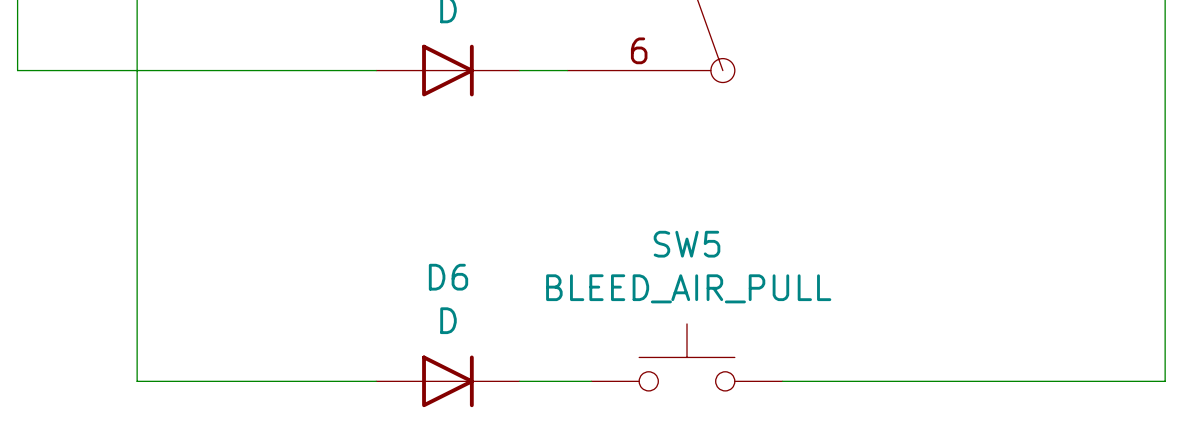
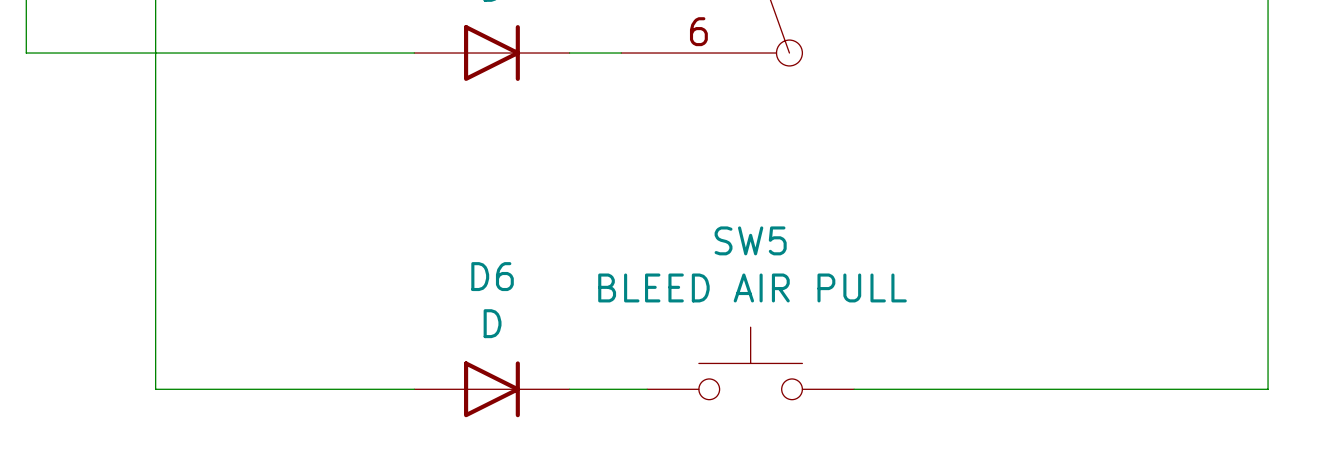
SW5 value: BLEED_AIR_PULL (688, 288) -> BLEED AIR PULL (752, 287)

